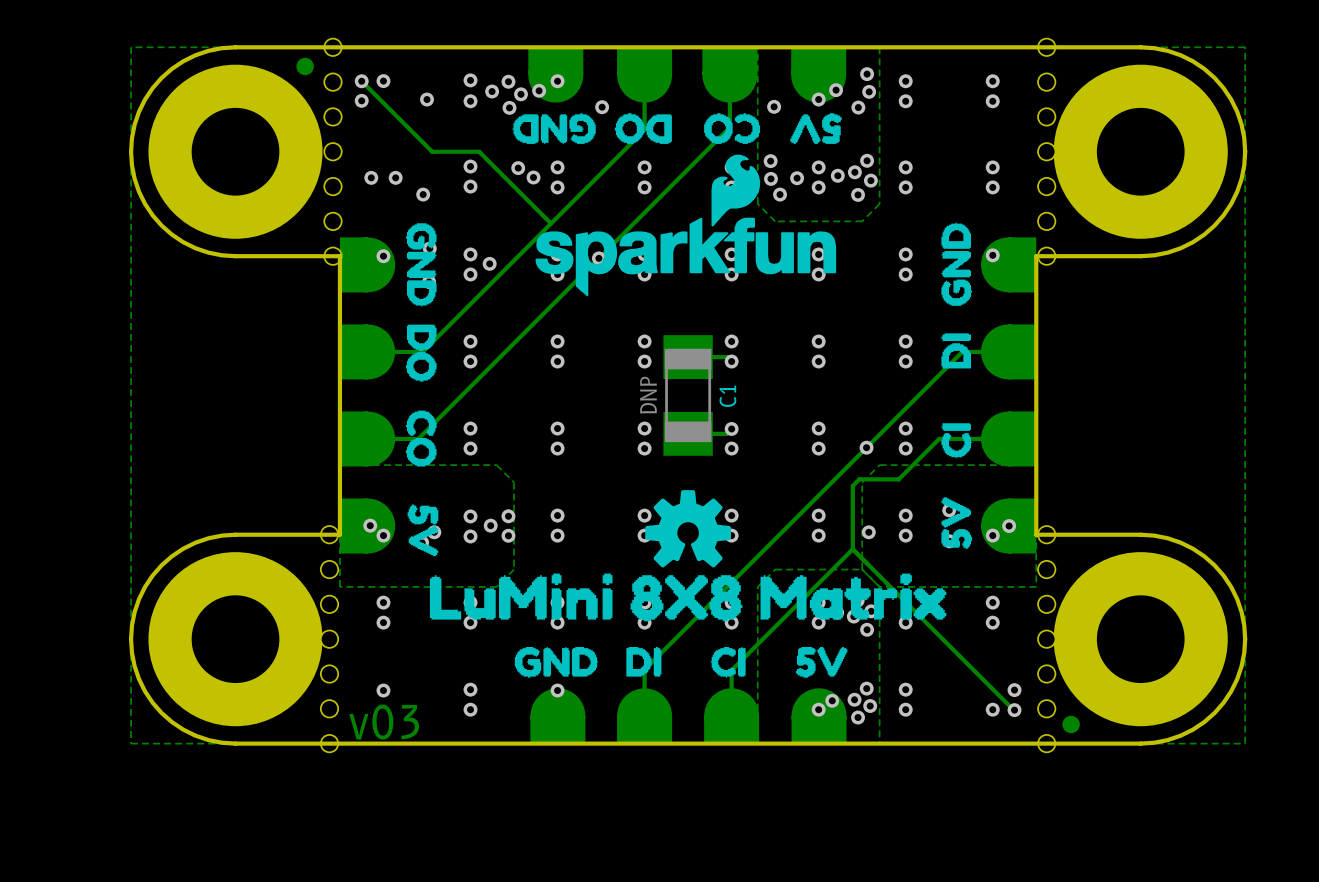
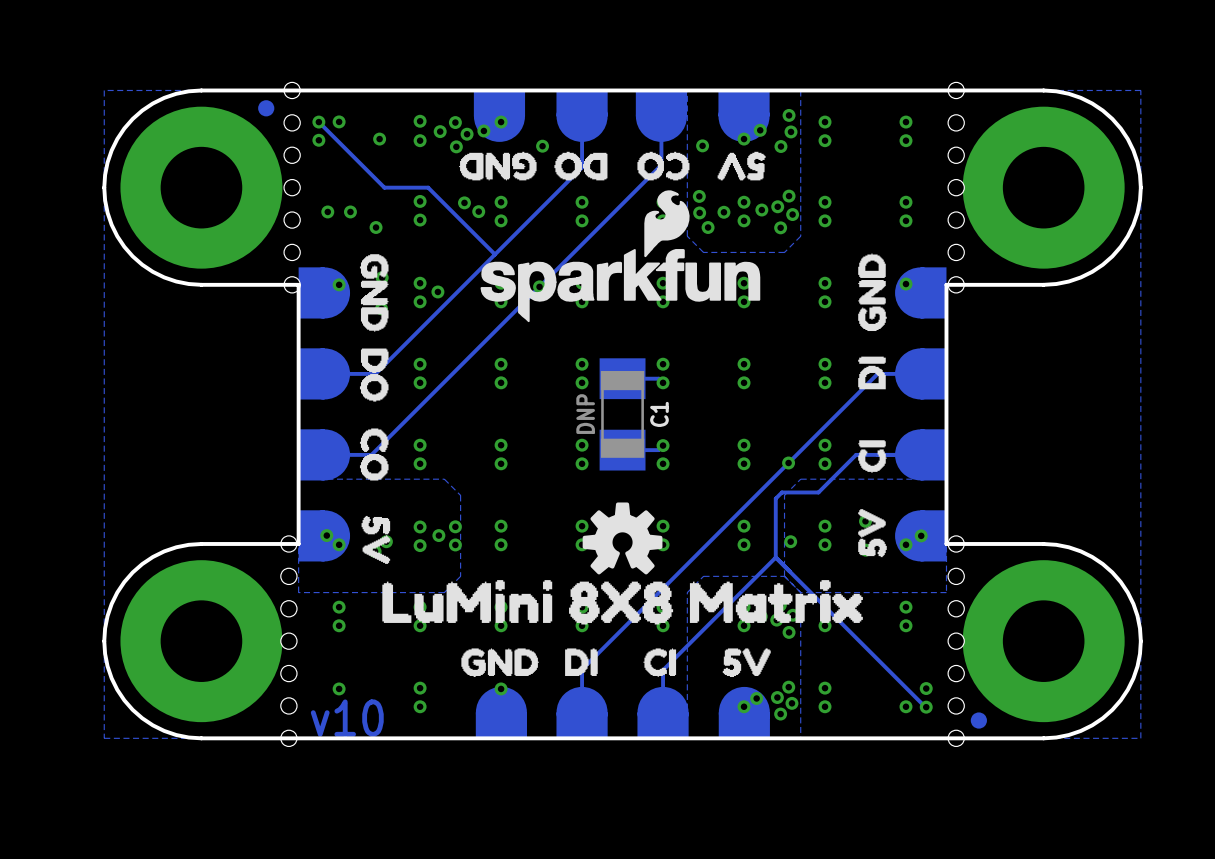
text: v03 (384, 722) -> v10 (347, 718)

